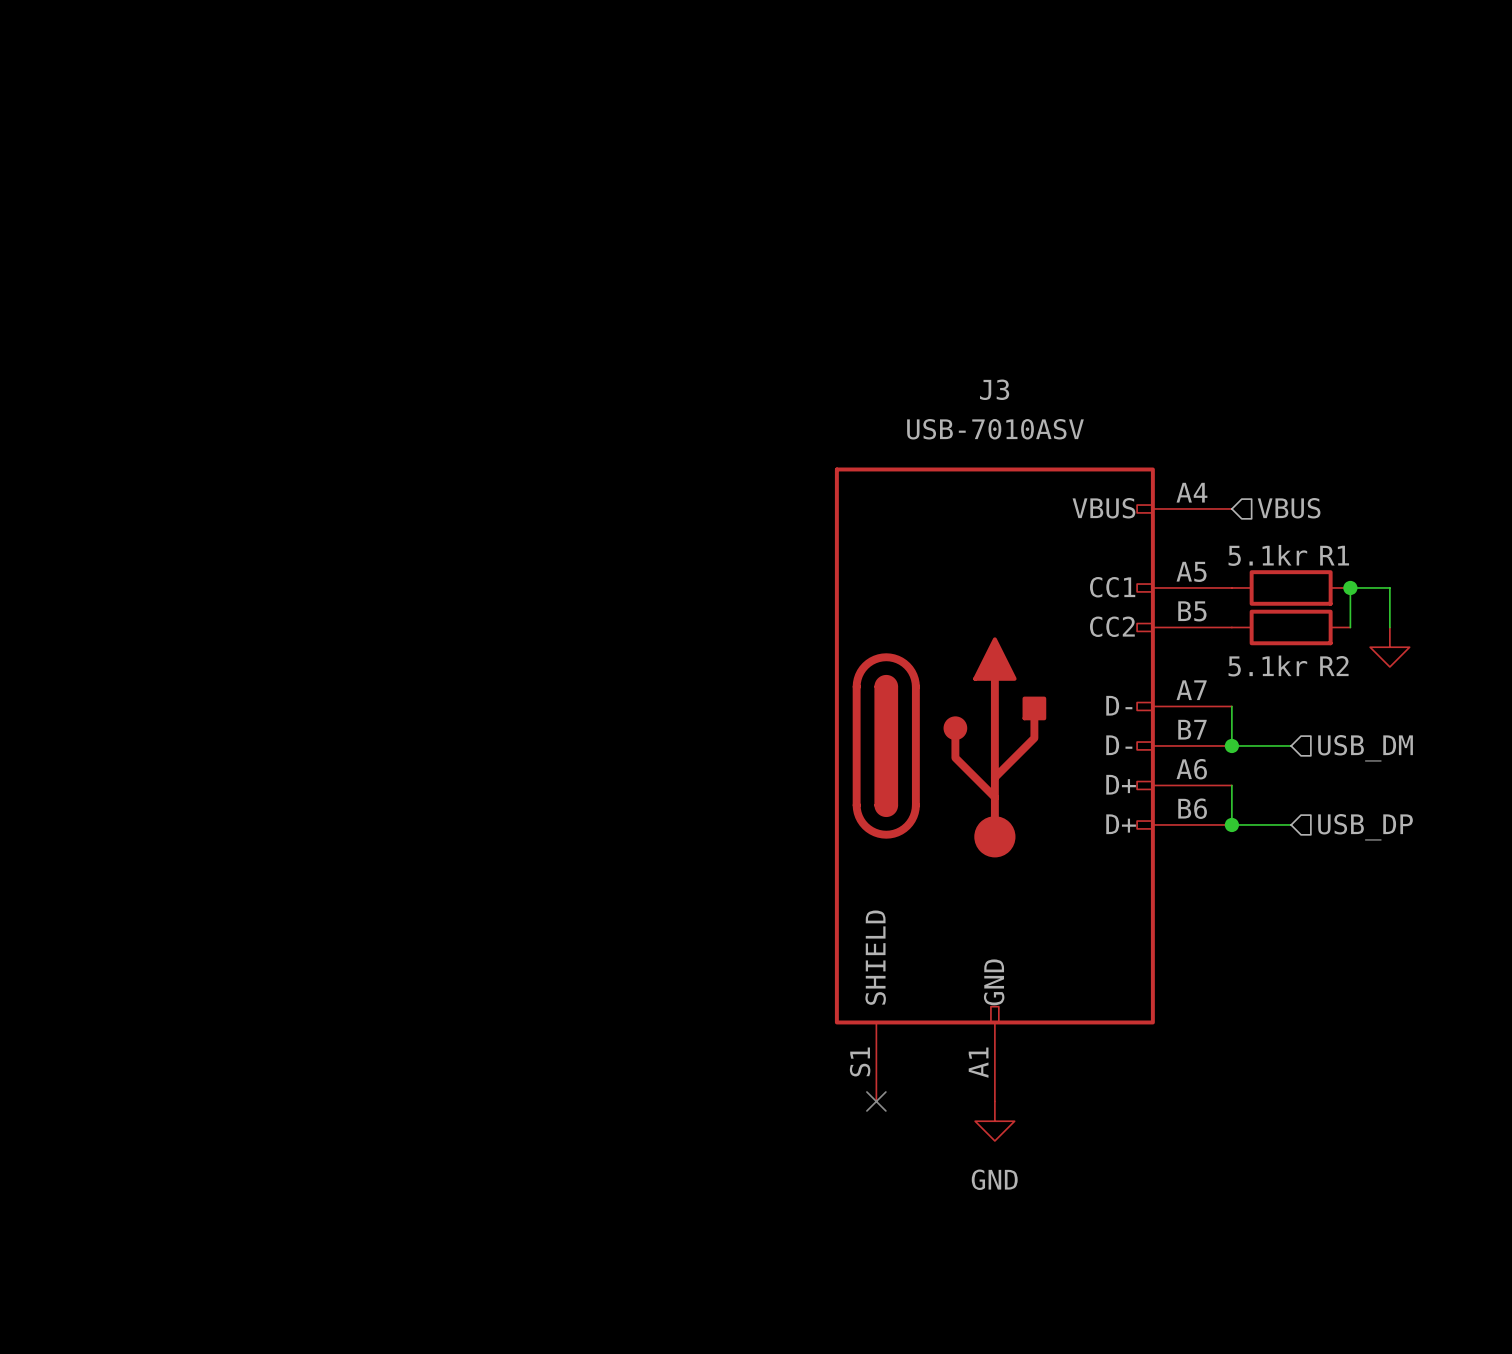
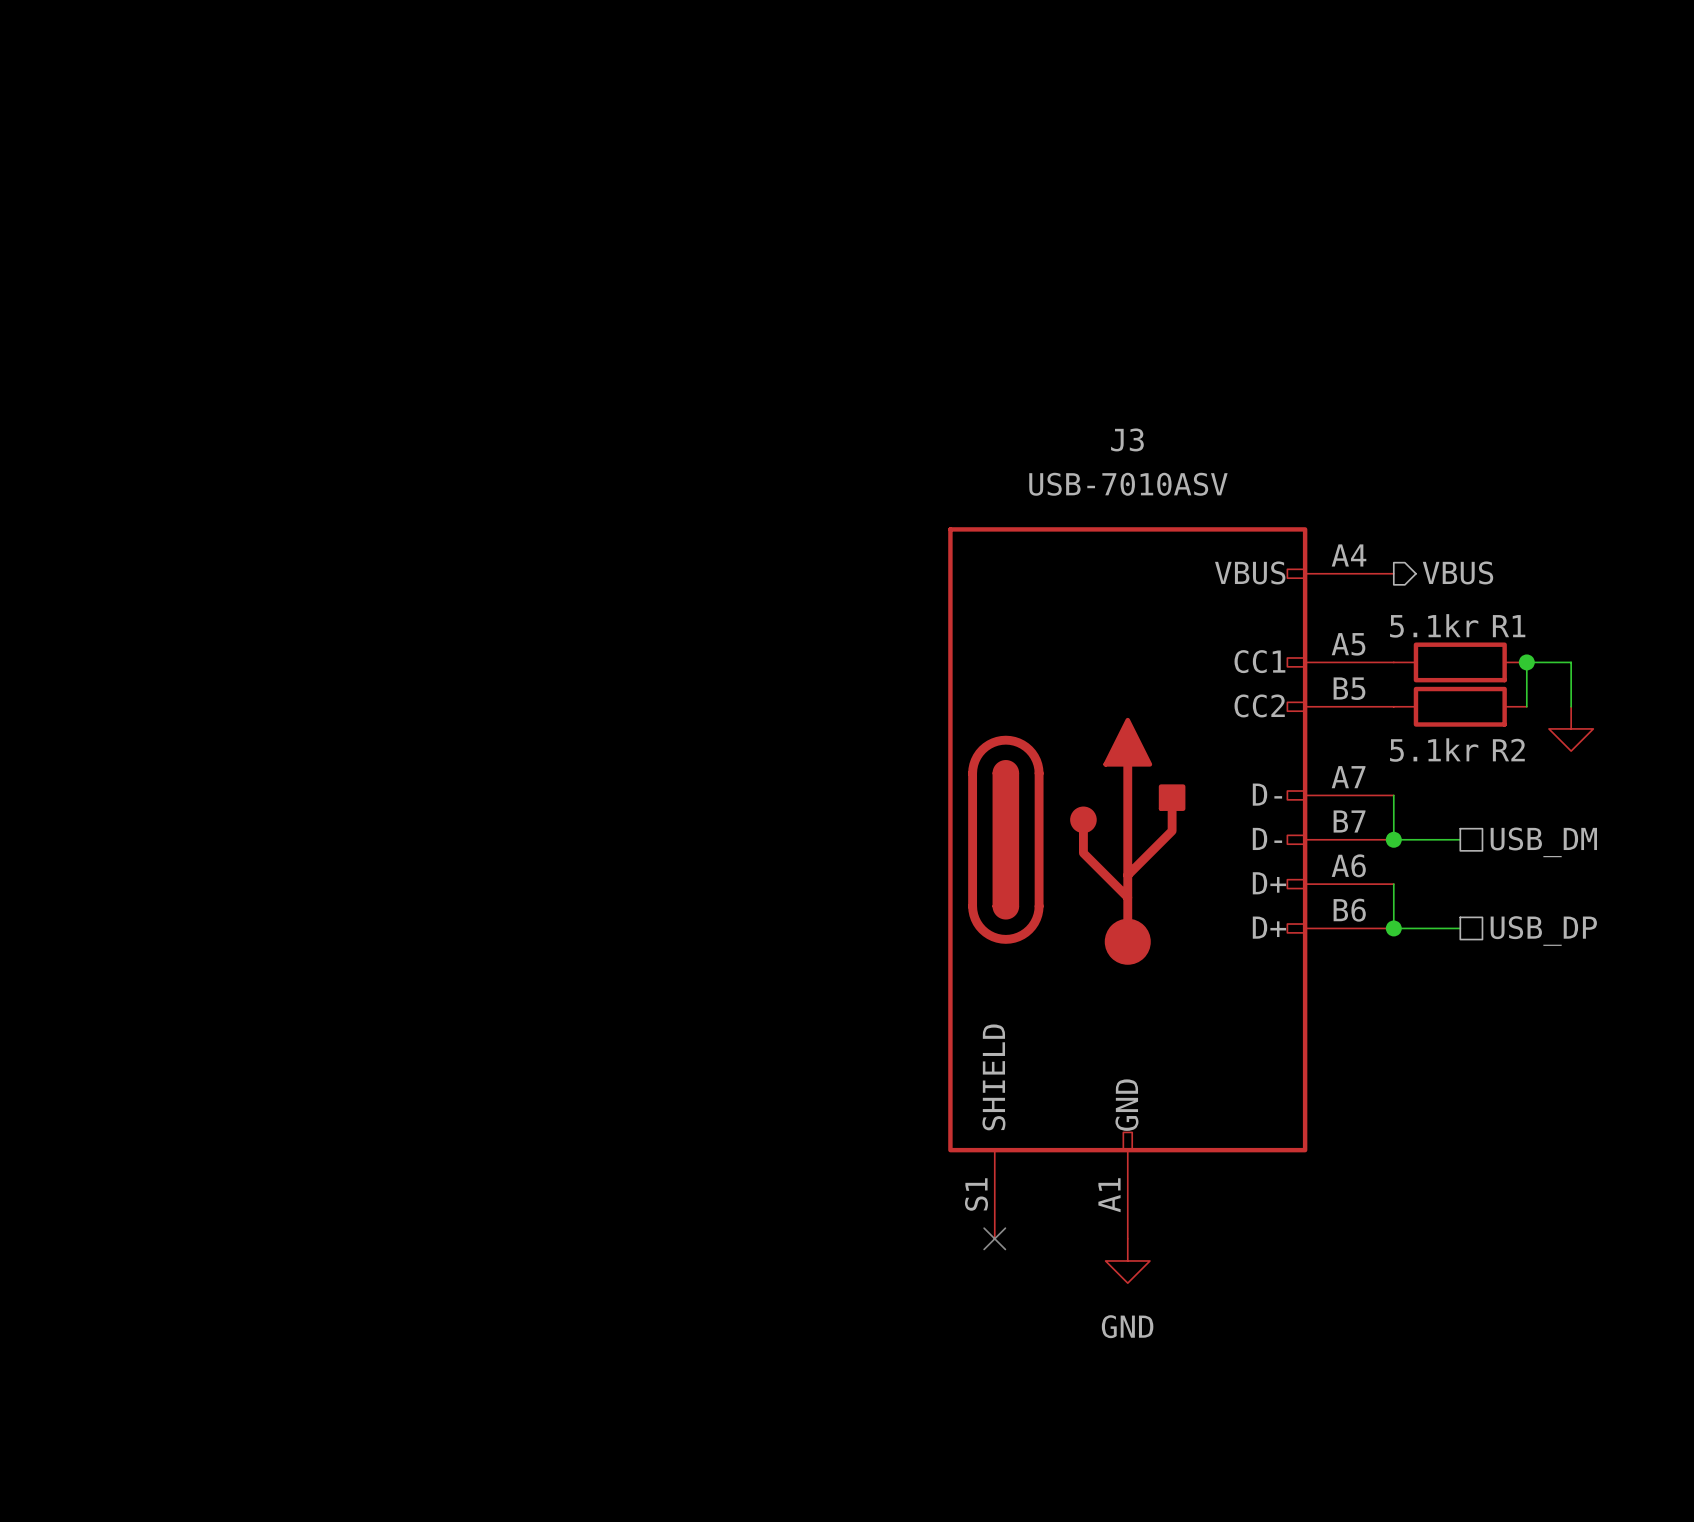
hierarchical label shape: input (1289, 508) -> output (1457, 572)
hierarchical label shape: input (1365, 748) -> passive (1543, 842)
hierarchical label shape: input (1365, 827) -> passive (1543, 931)

